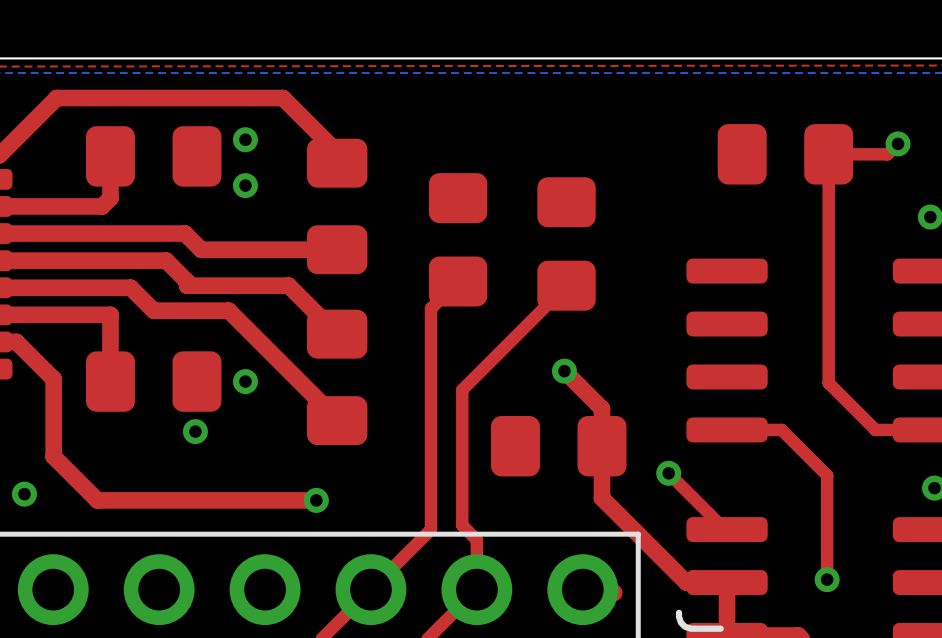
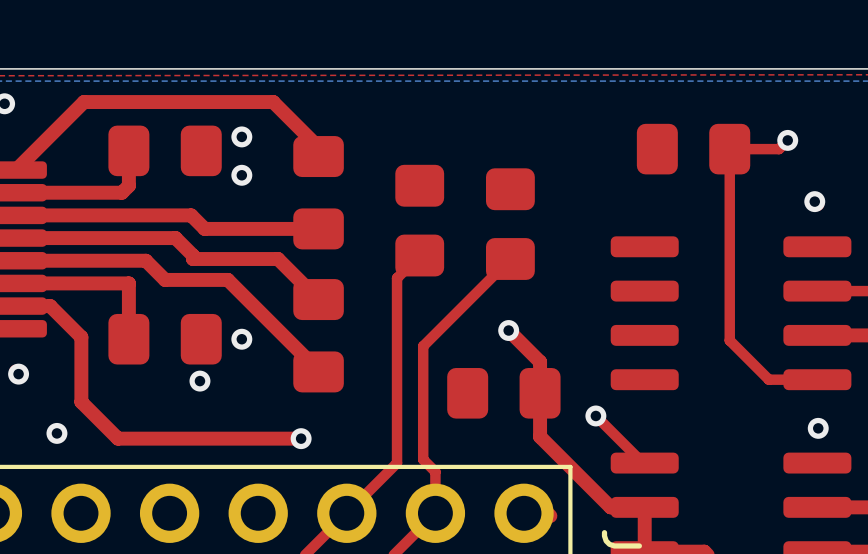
top track: (727, 429) (781, 429) (827, 475) (827, 579) -> none
via: (827, 579) -> none

